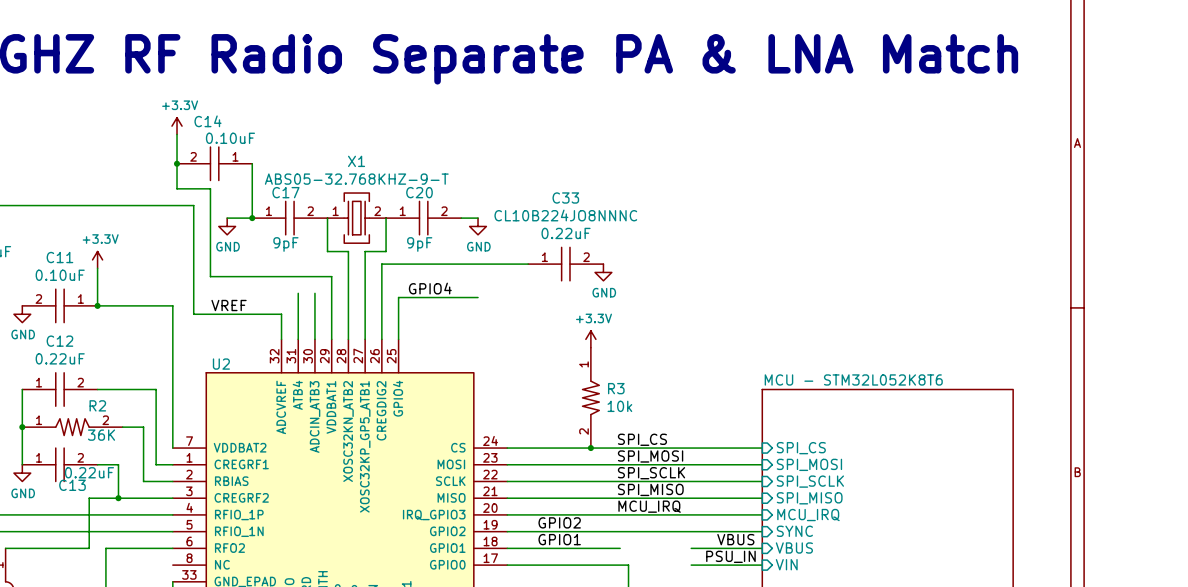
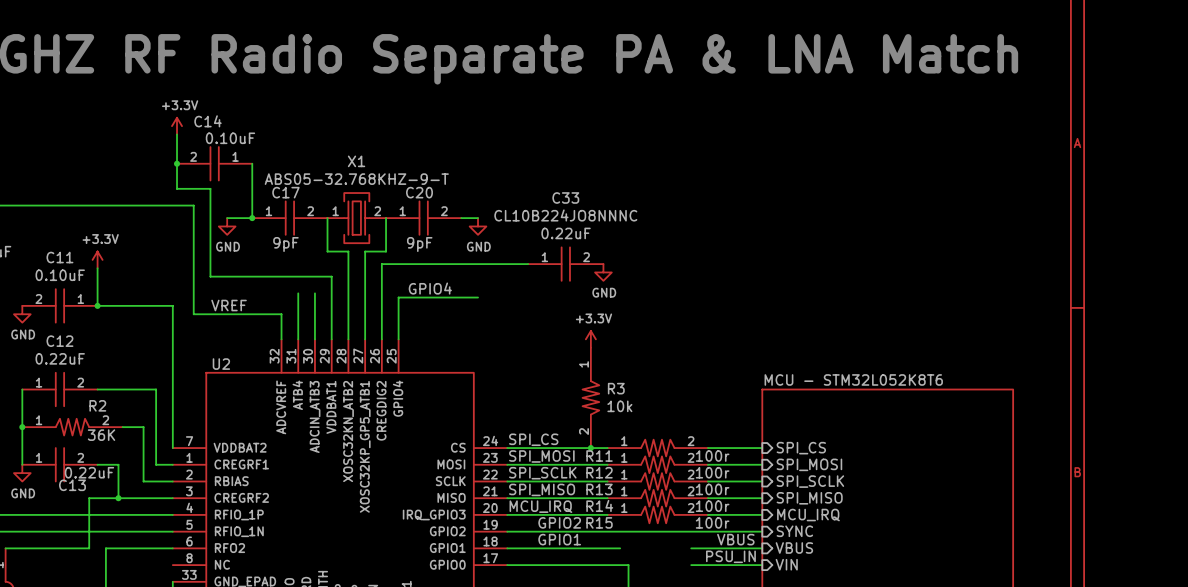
label position: SPI_CS (642, 439) -> SPI_CS (533, 439)
R11: none -> (657, 448)
label position: SPI_MOSI (650, 456) -> SPI_MOSI (541, 456)
R12: none -> (657, 464)
label position: SPI_SCLK (651, 473) -> SPI_SCLK (542, 473)
R13: none -> (657, 481)
label position: SPI_MISO (650, 489) -> SPI_MISO (542, 489)
R14: none -> (657, 498)
label position: MCU_IRQ (649, 506) -> MCU_IRQ (540, 506)
R15: none -> (657, 514)

